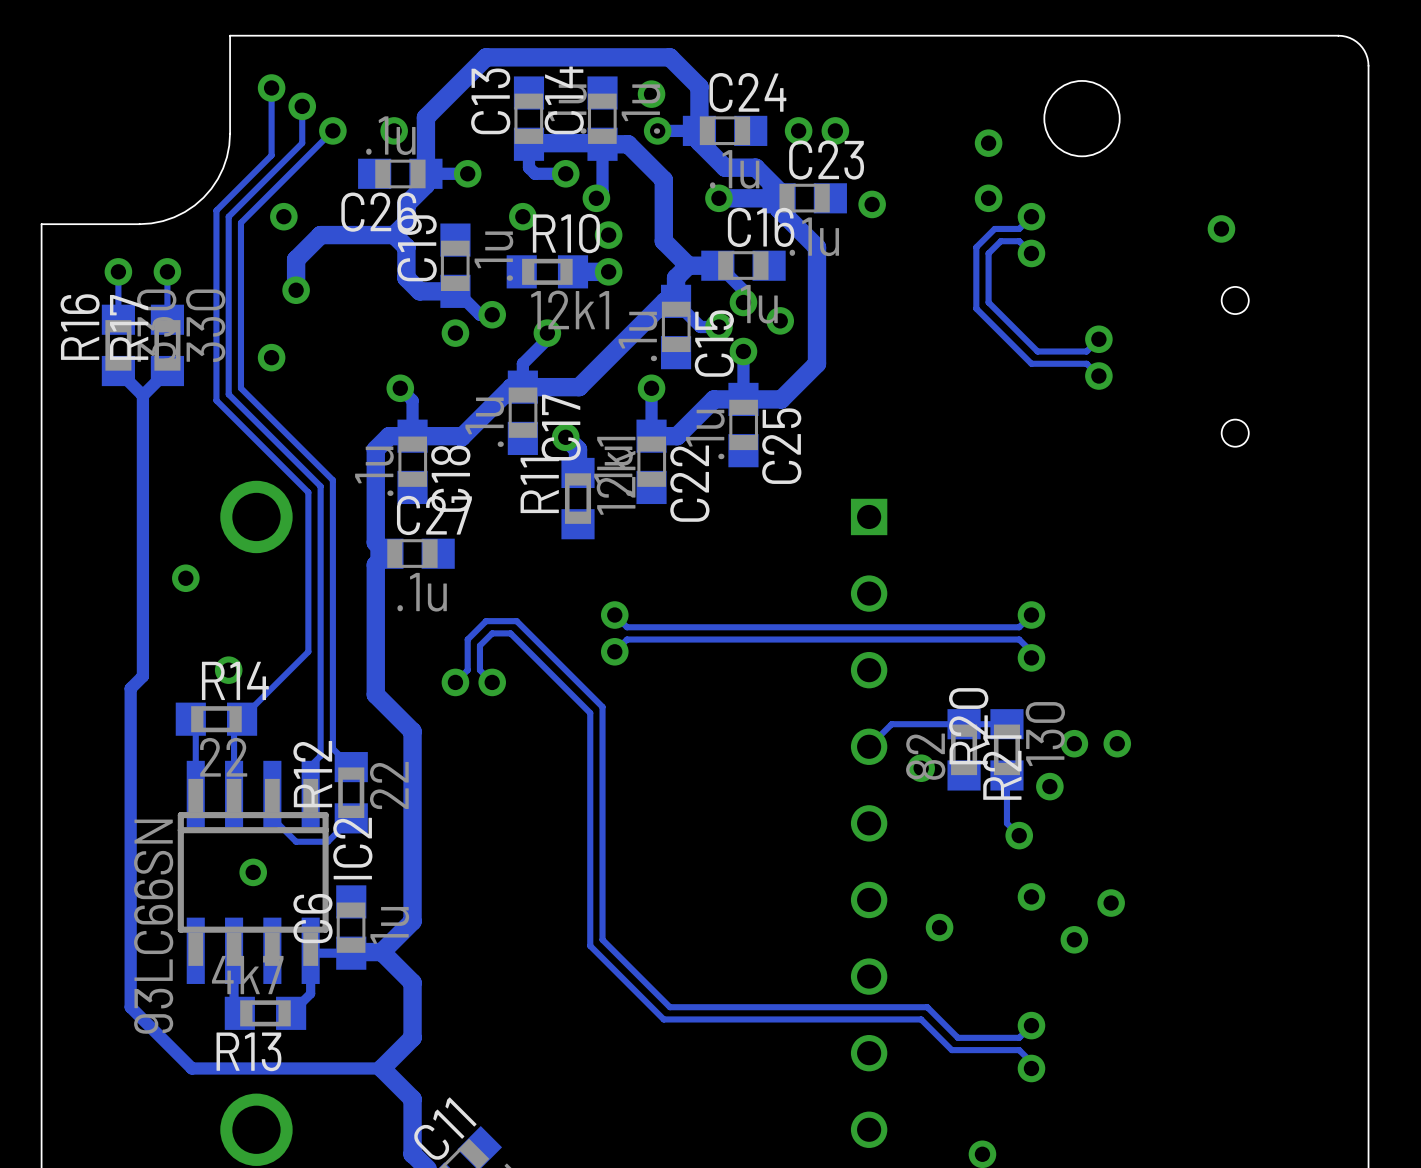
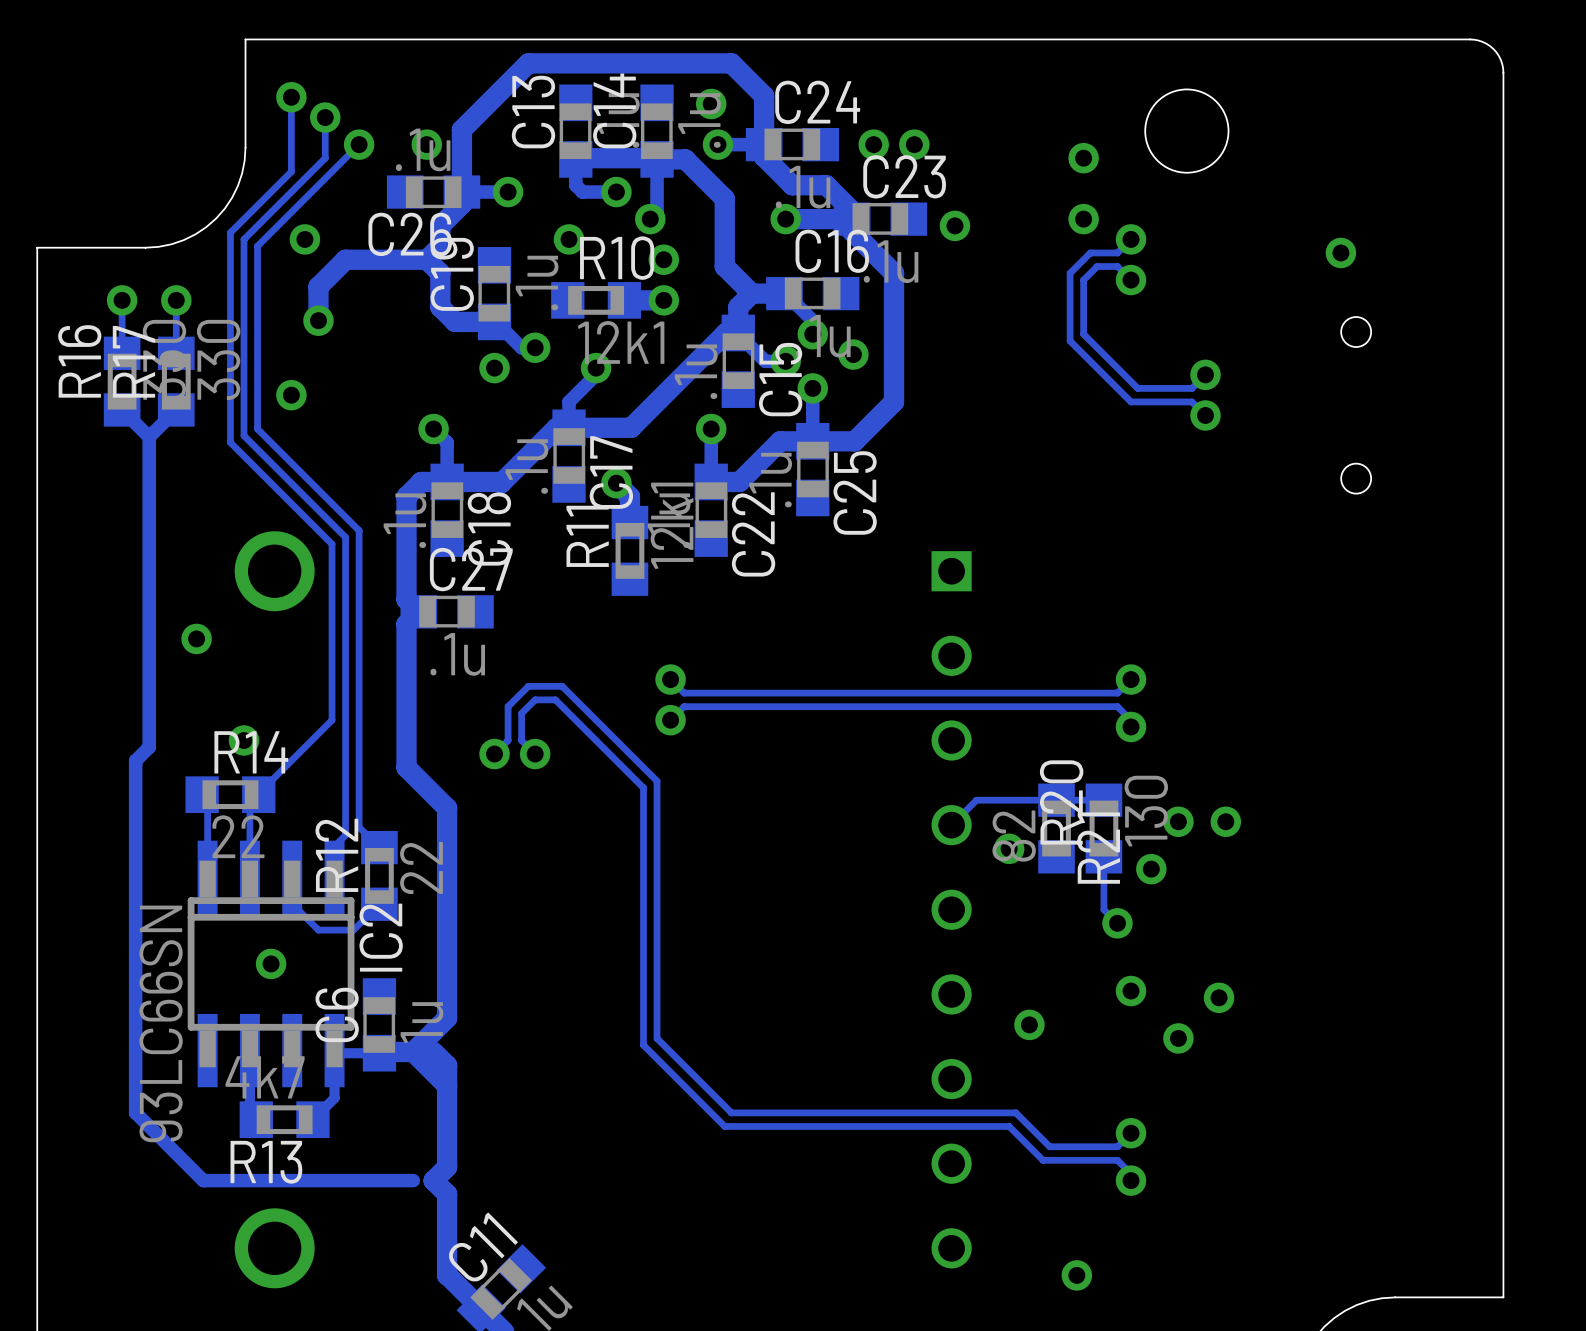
track: none -> (433, 1051) (447, 1065) (447, 1085)
track: (412, 1037) (381, 1068) (412, 1099) -> (447, 1146) (447, 1167) (433, 1180) (447, 1194) (447, 1214)

